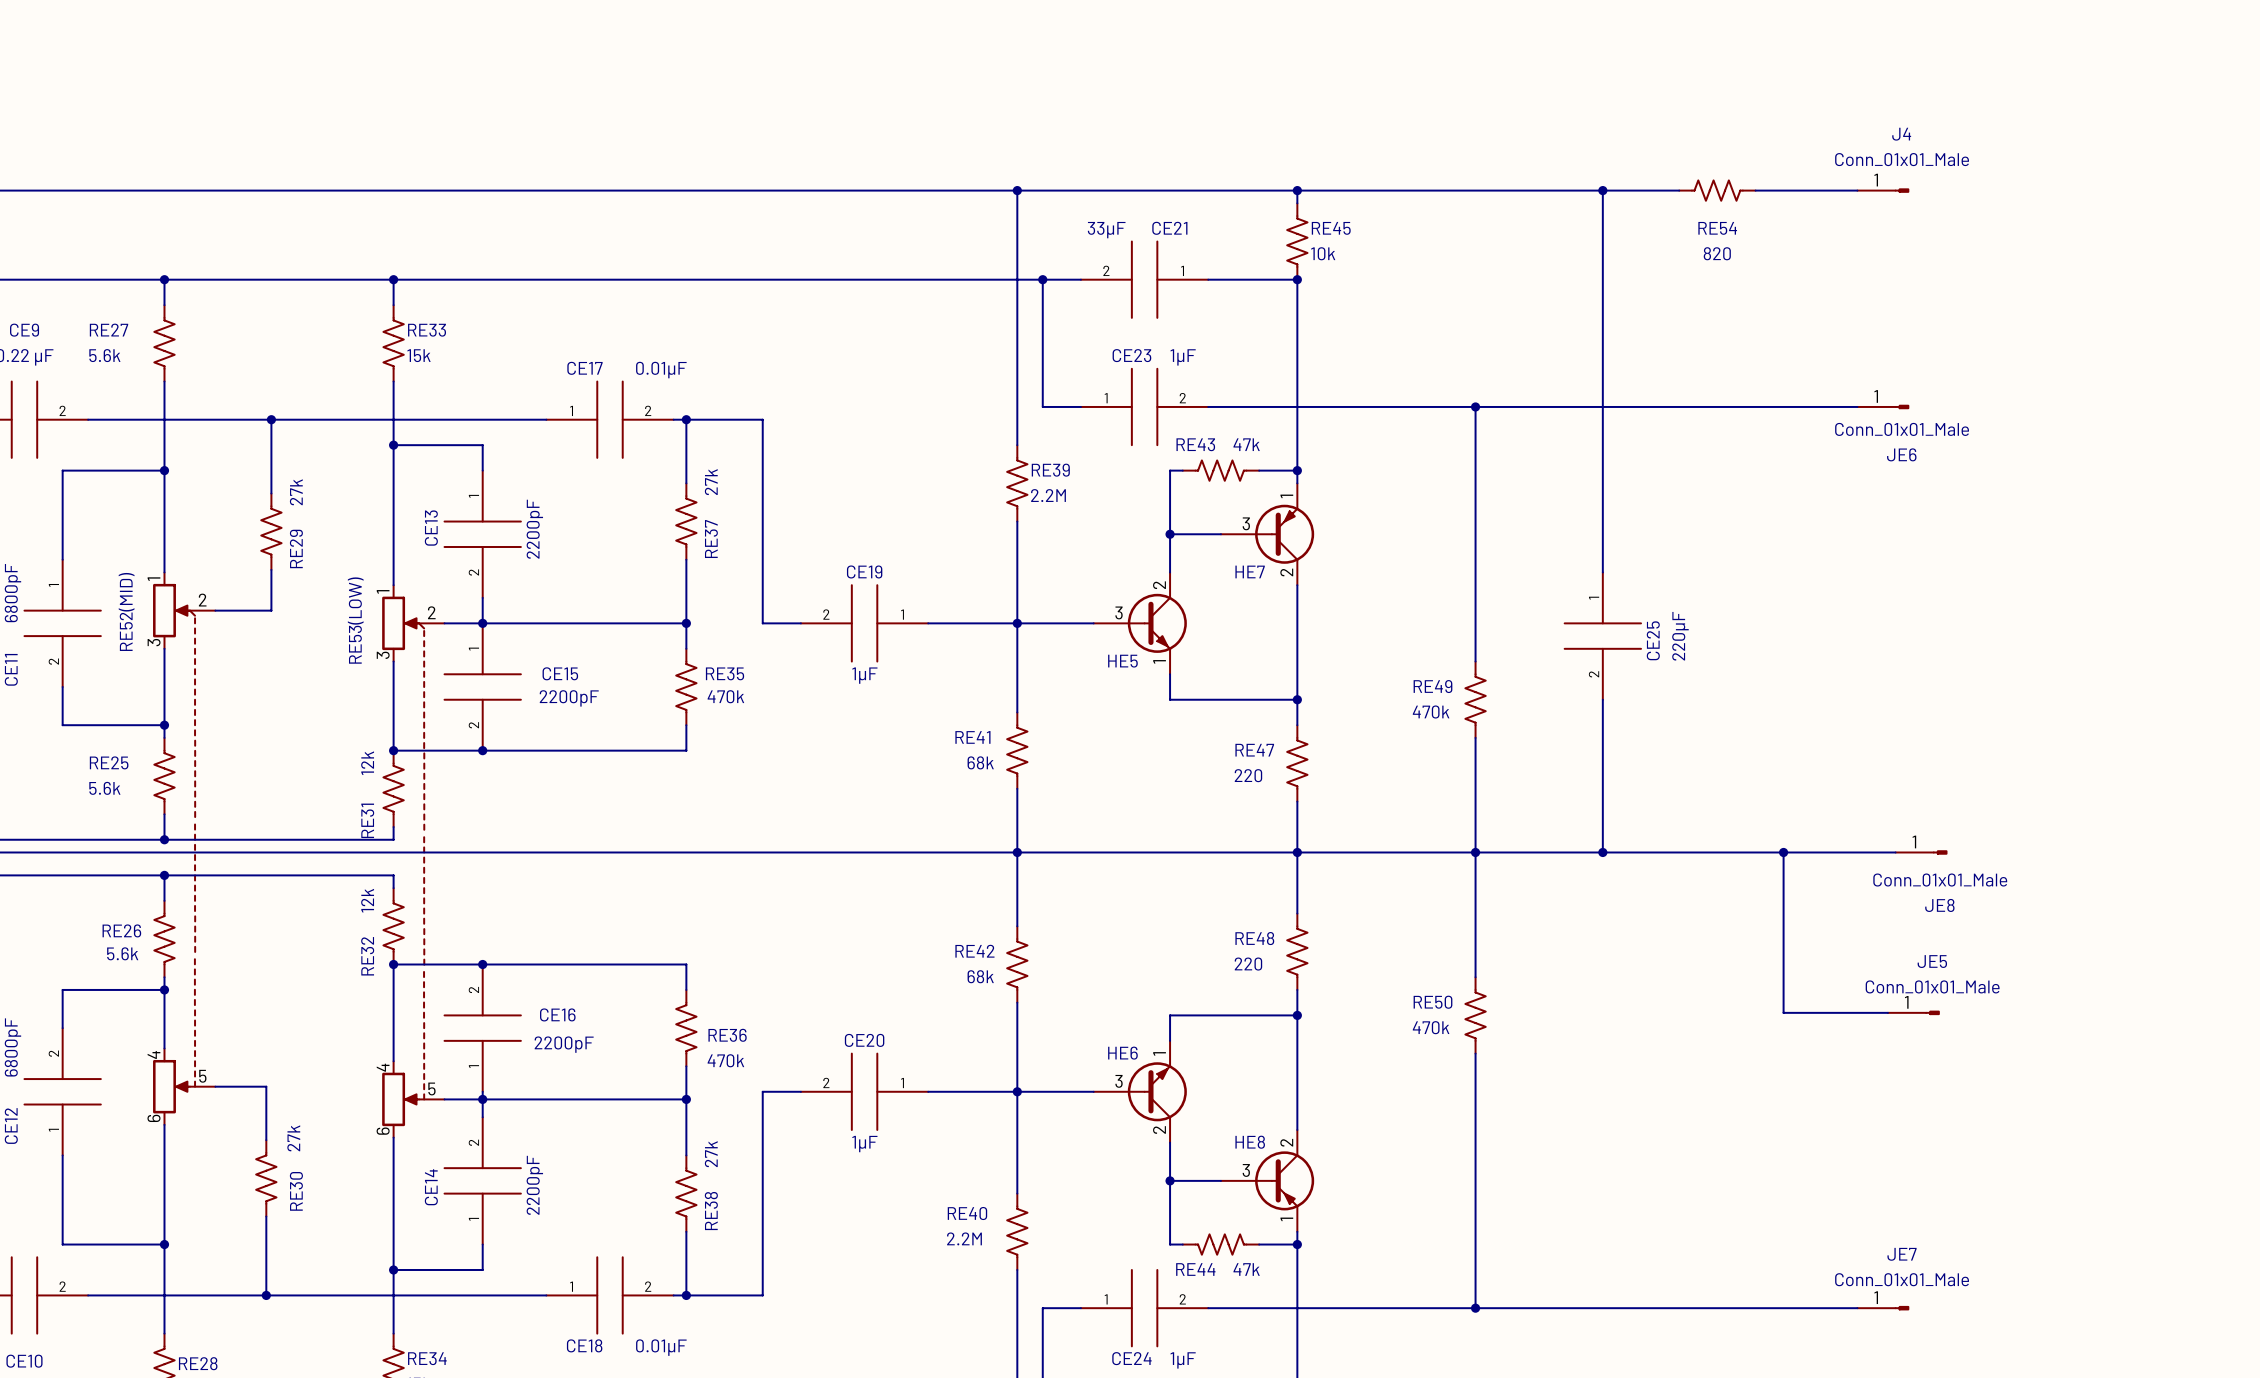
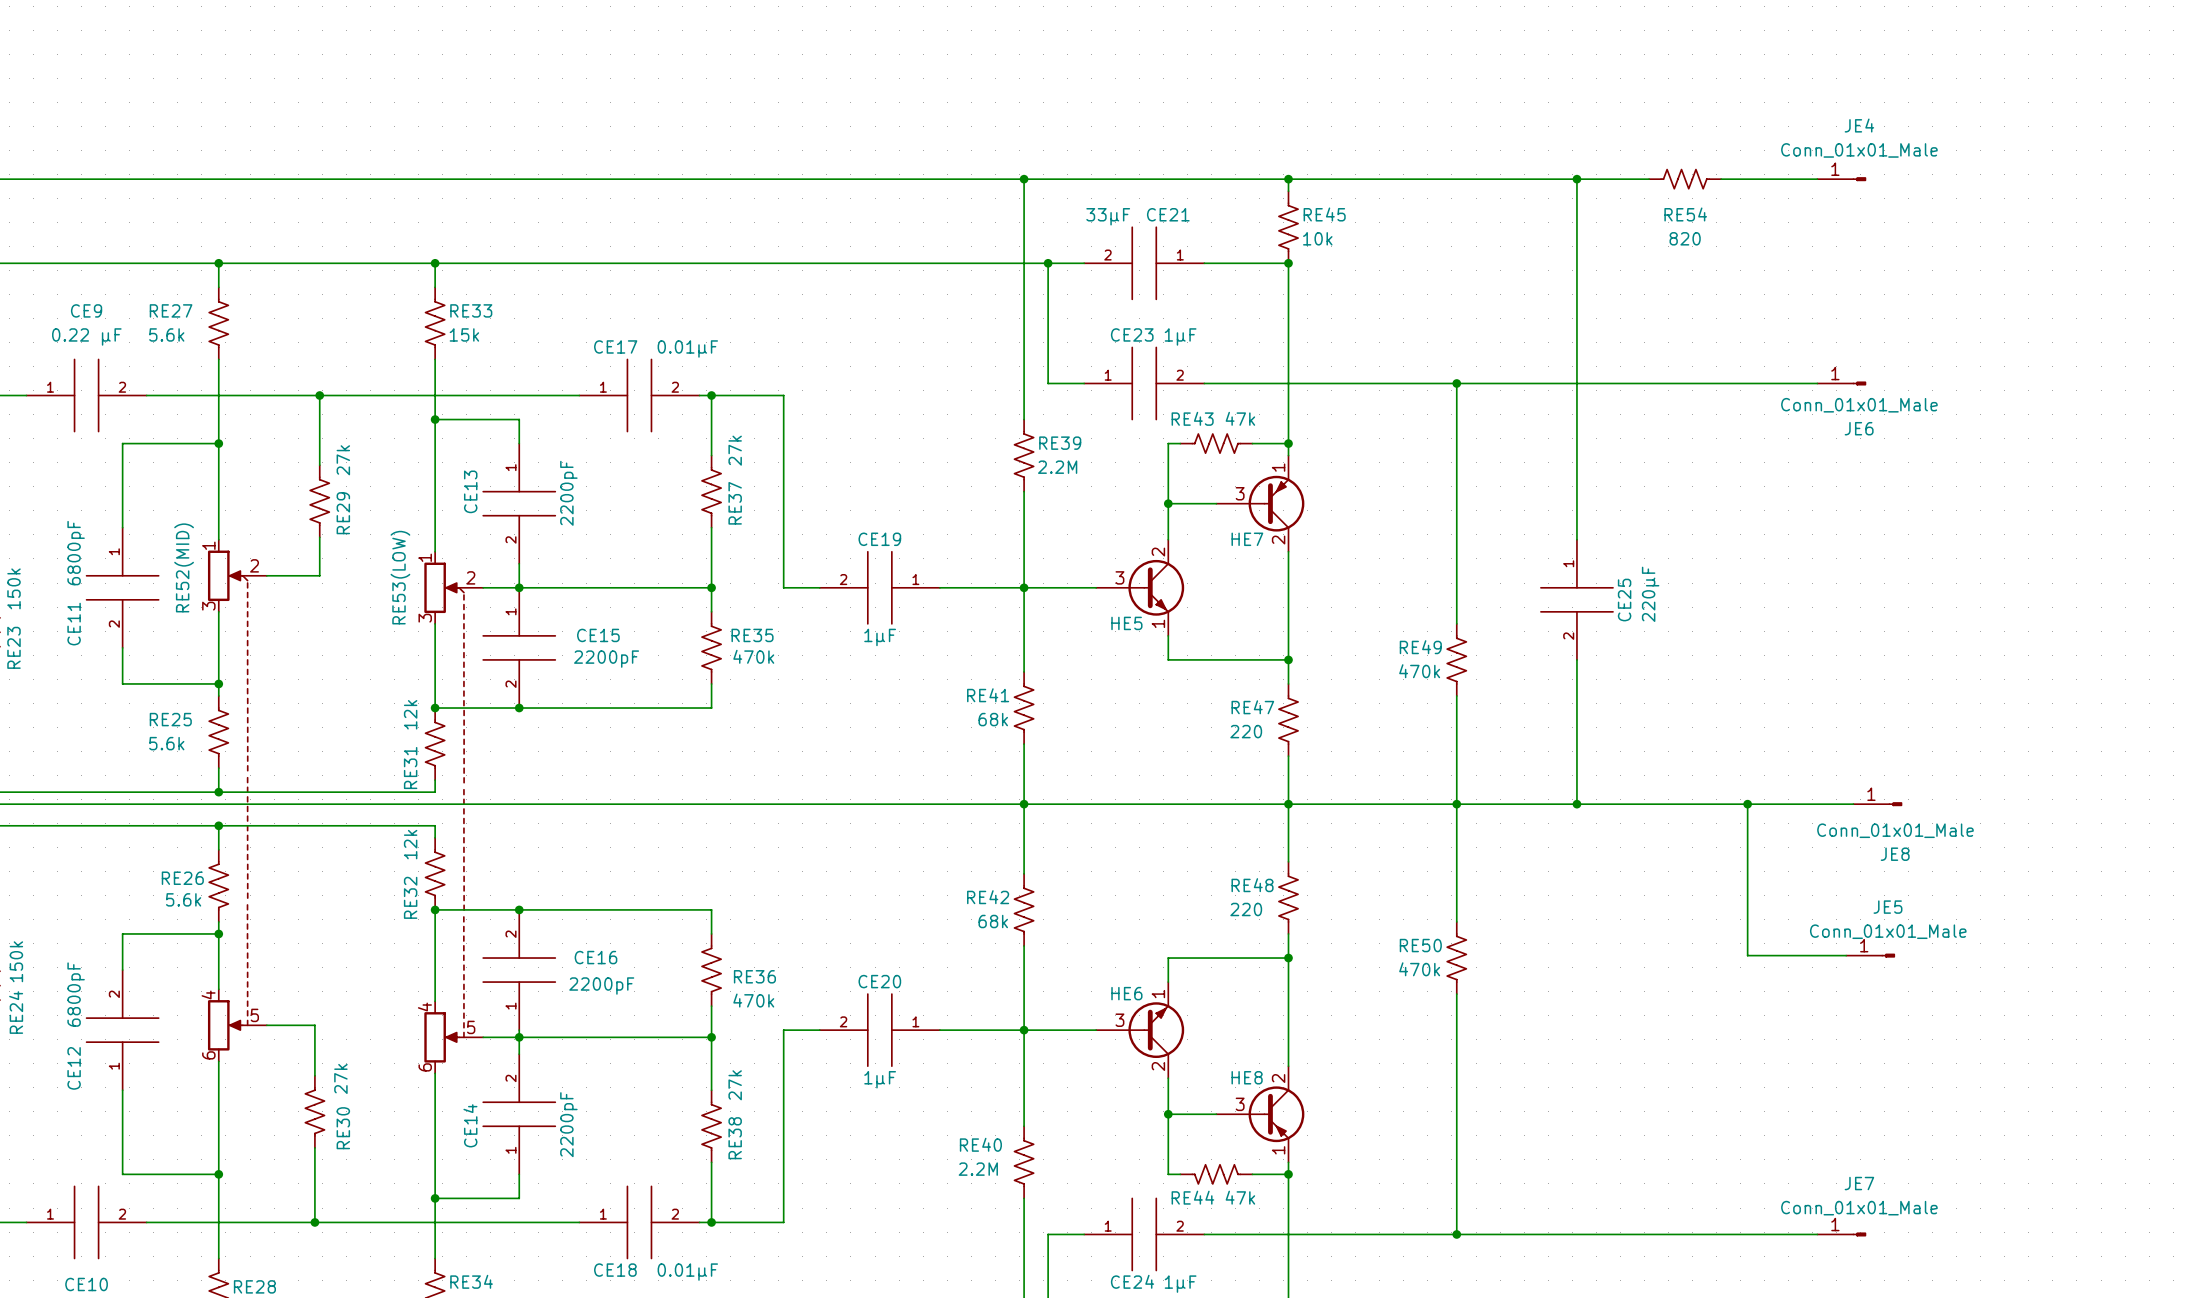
J4 name: J4 (1901, 134) -> JE4 (1859, 125)

